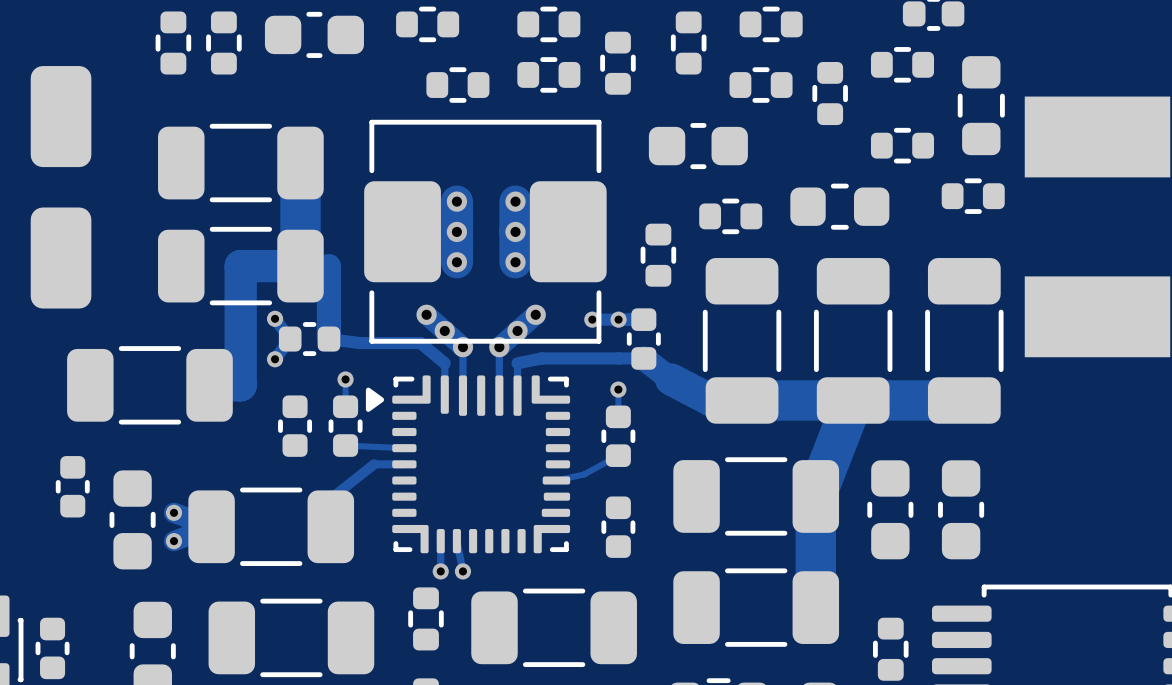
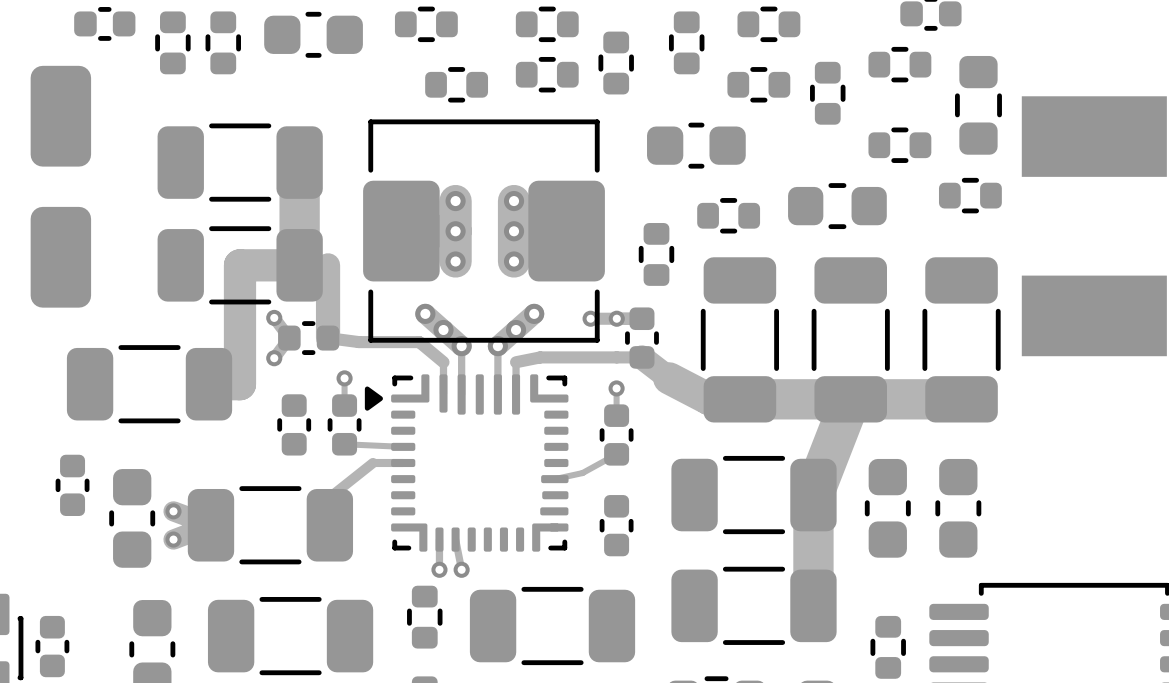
part: none -> (104, 23)

